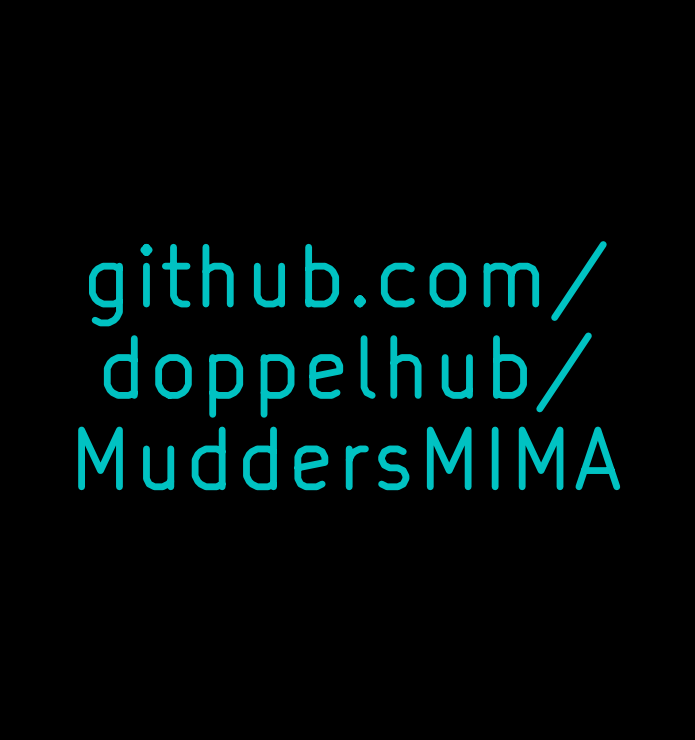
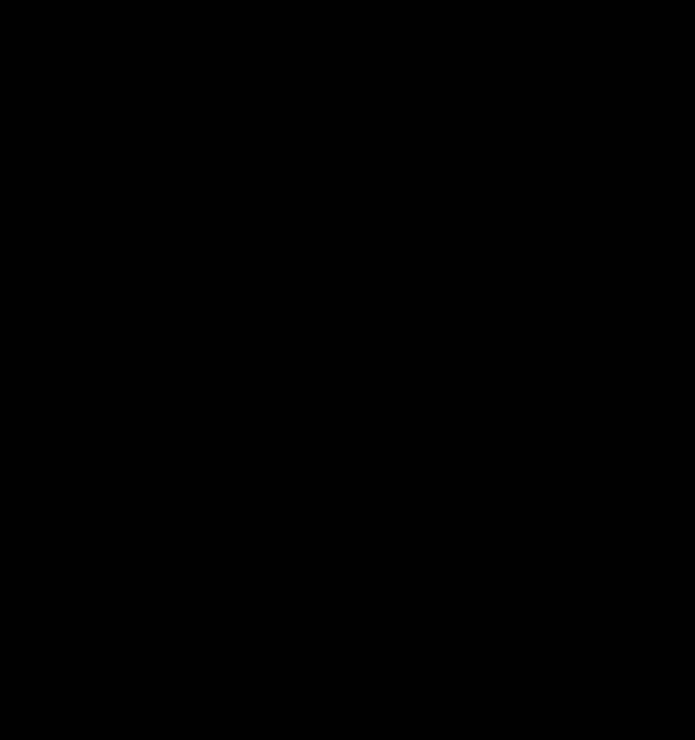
text: github.com/ (347, 283) -> none
text: doppelhub/ (347, 375) -> none
text: MuddersMIMA (349, 458) -> none

